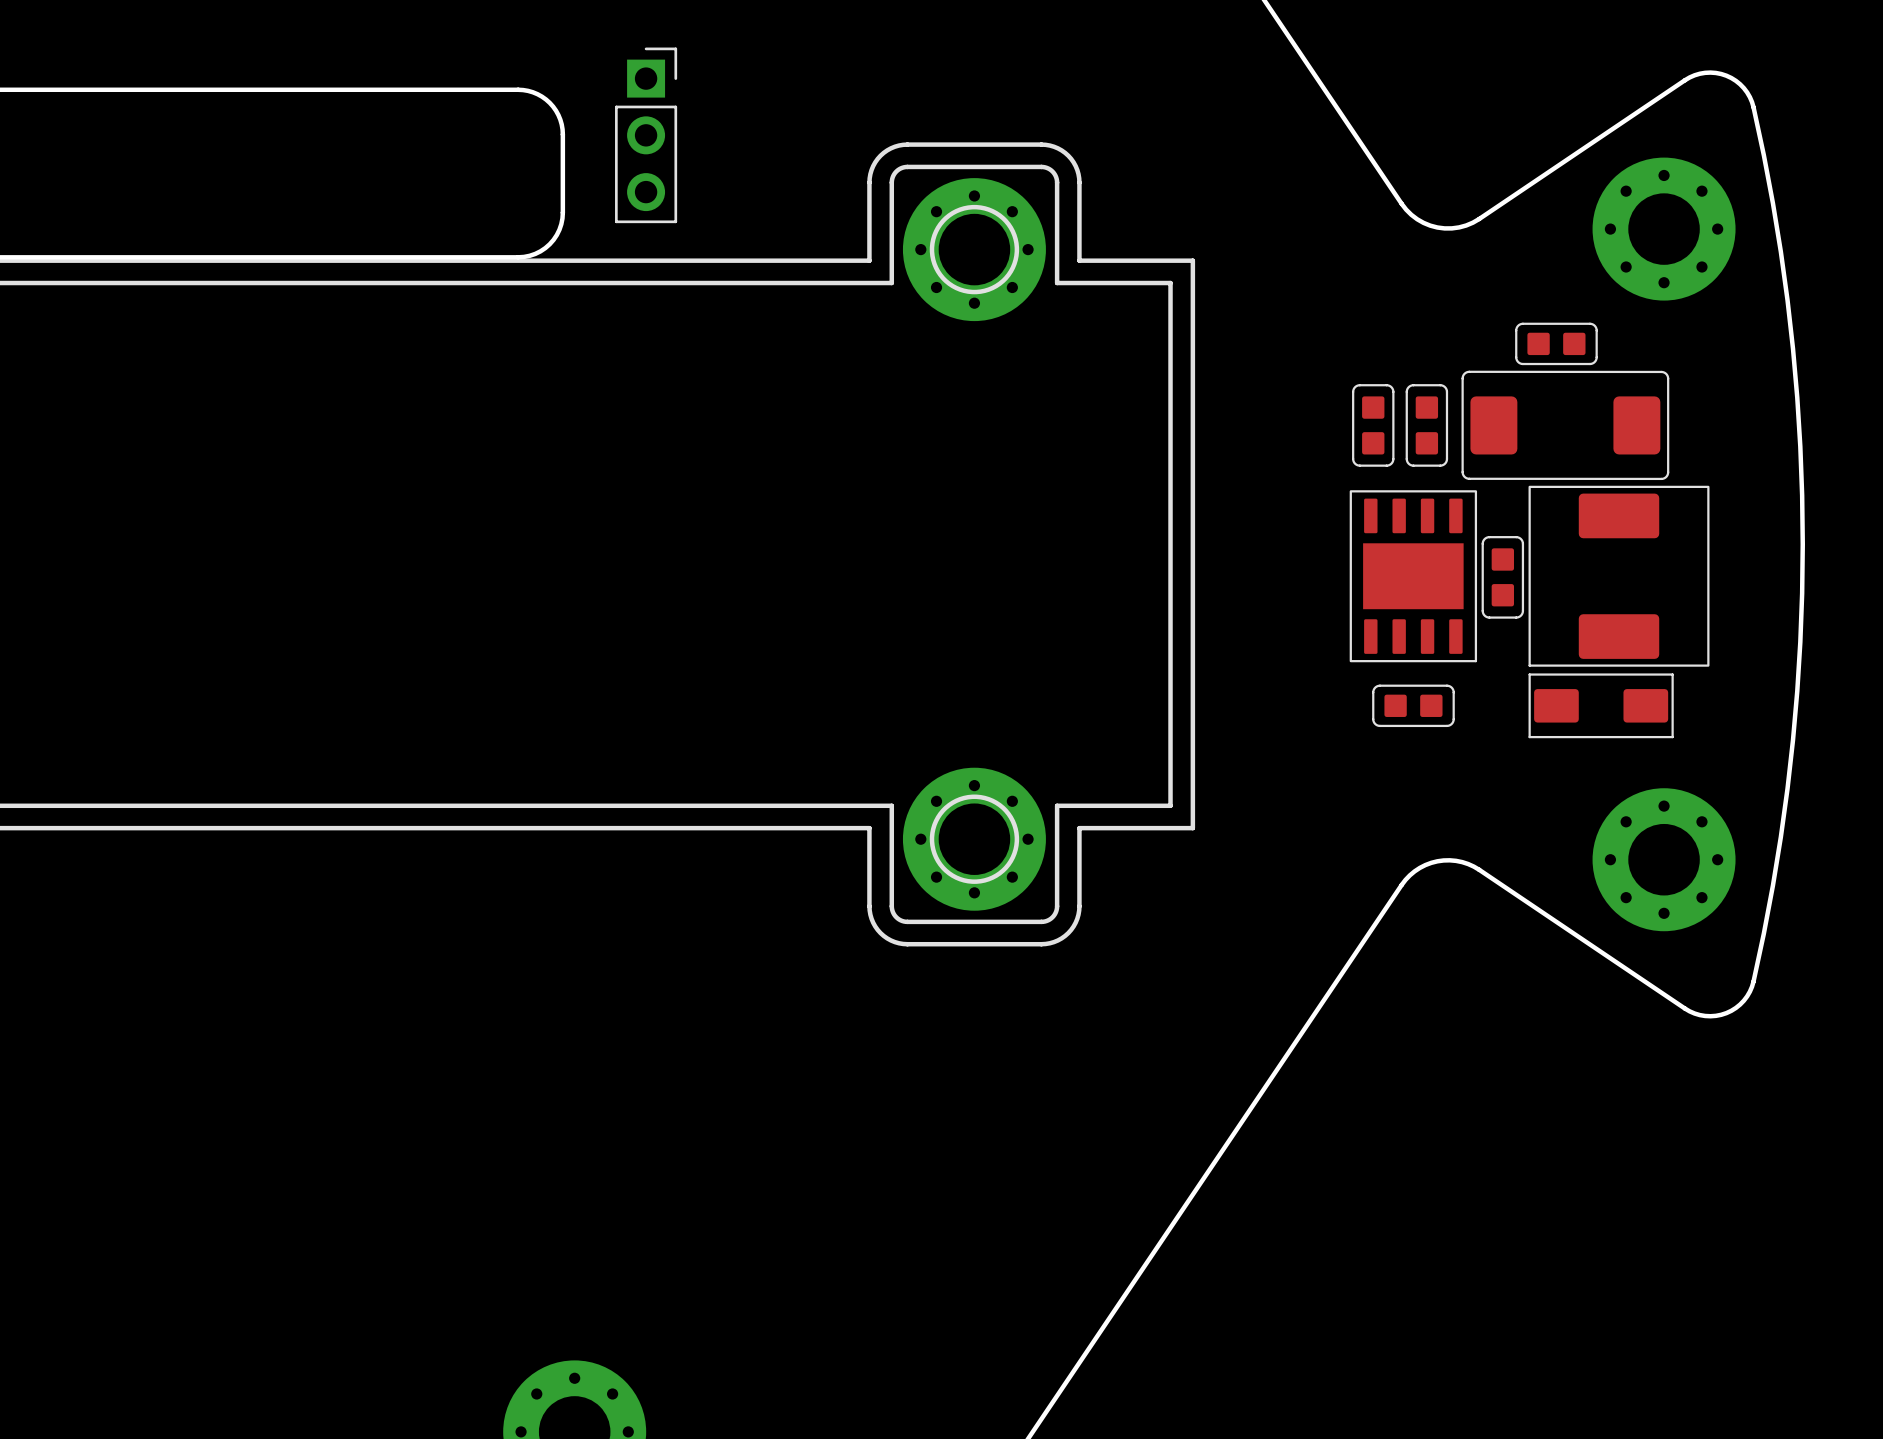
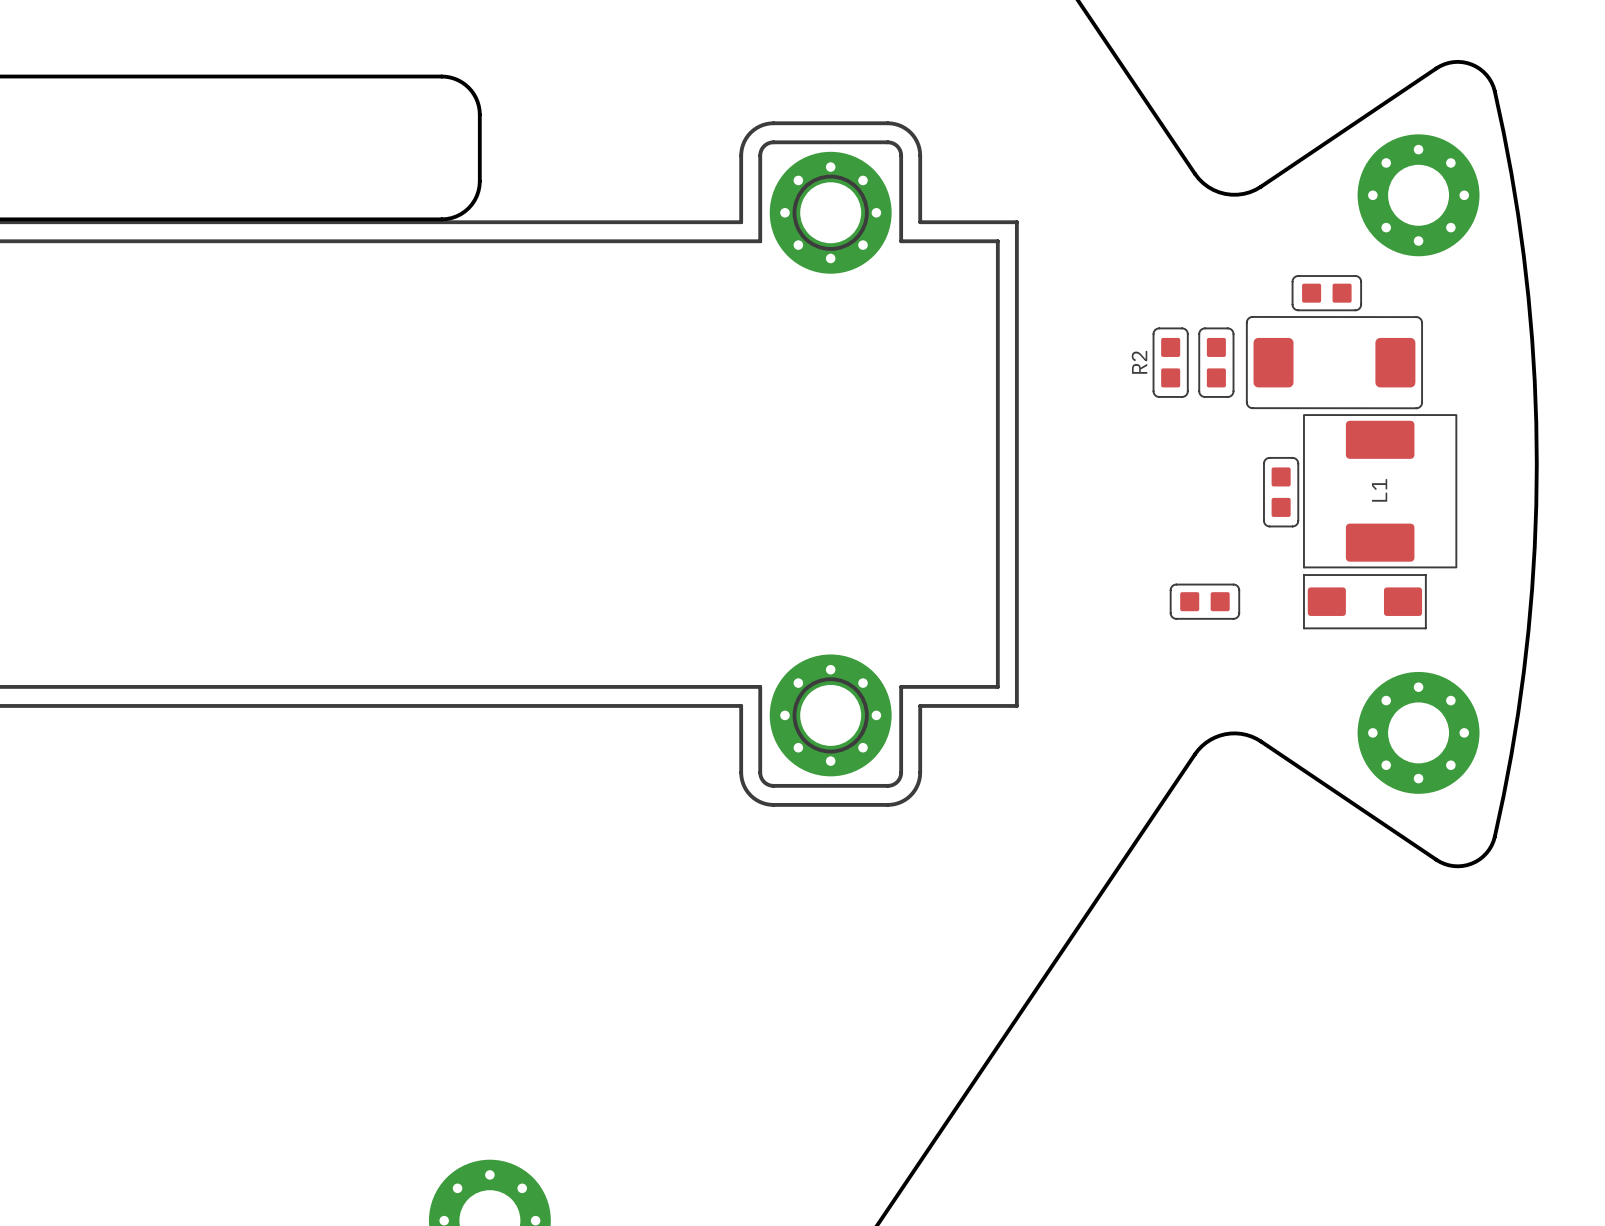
part: (646, 135) -> none
R2 name: none -> R2 (1139, 362)
L1 name: none -> L1 (1379, 490)
part: (1413, 576) -> none

